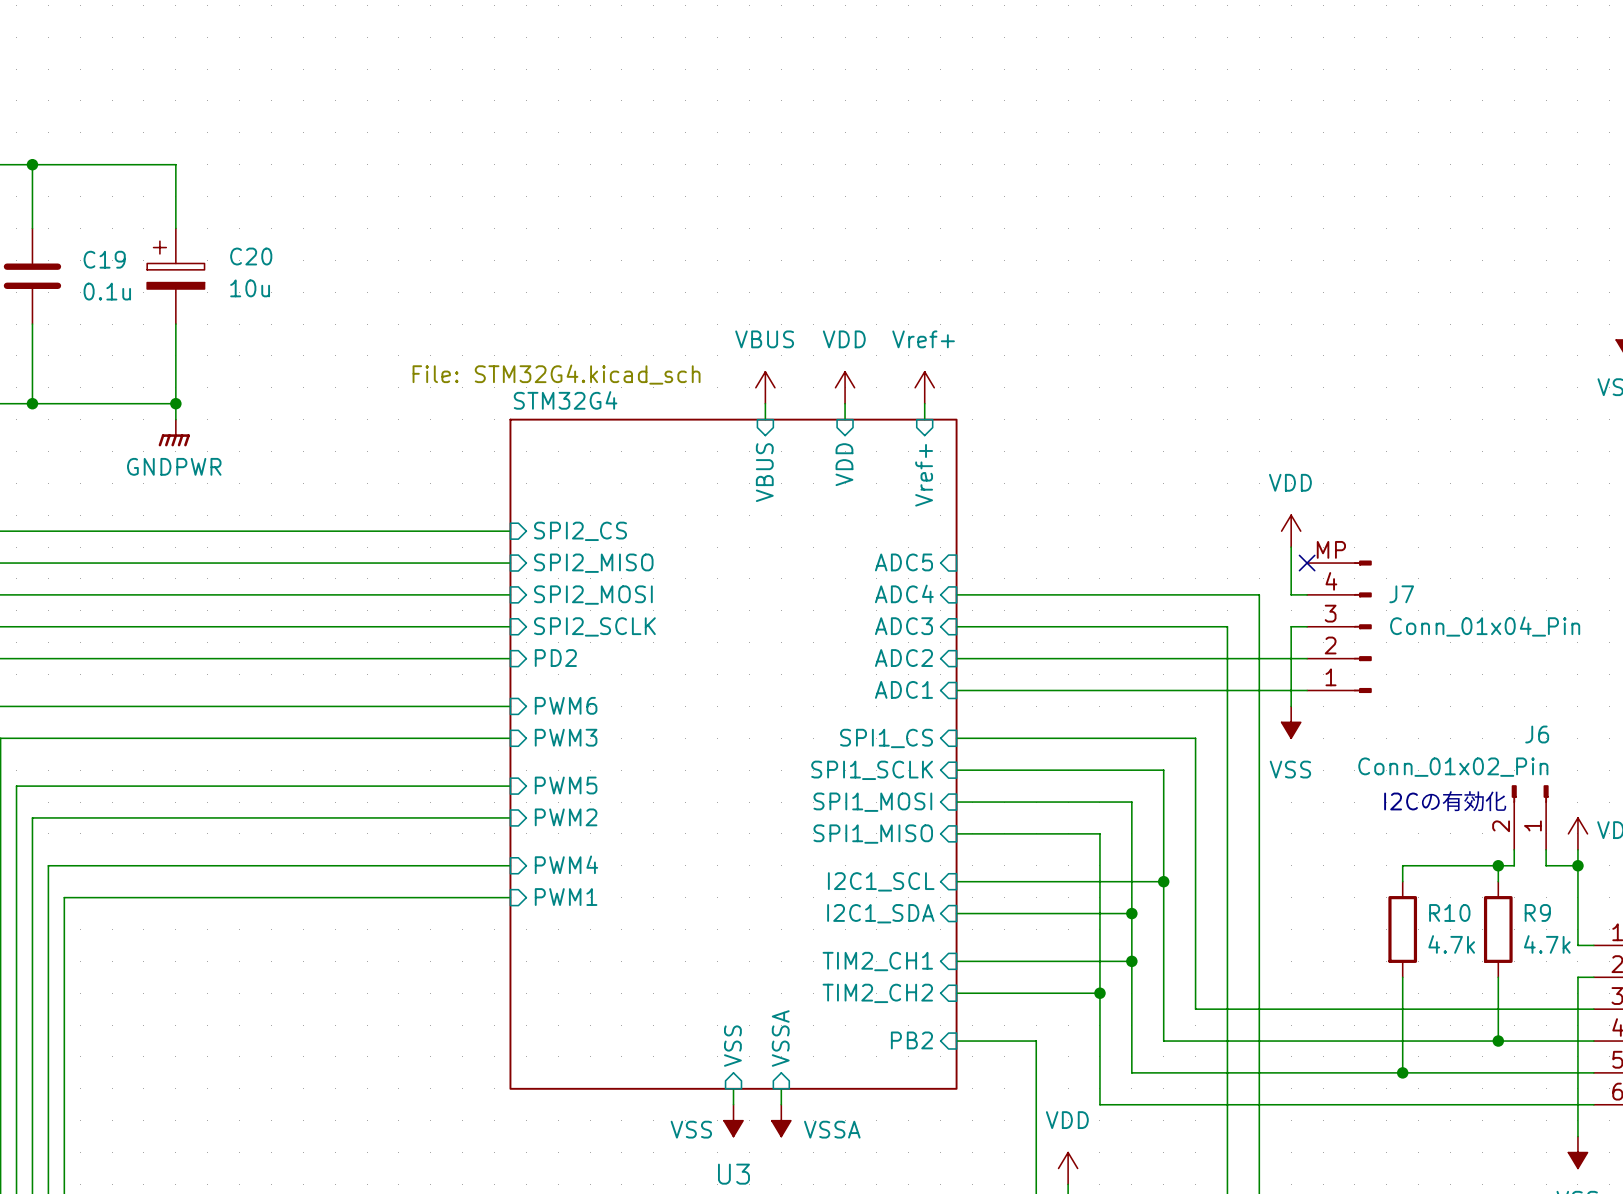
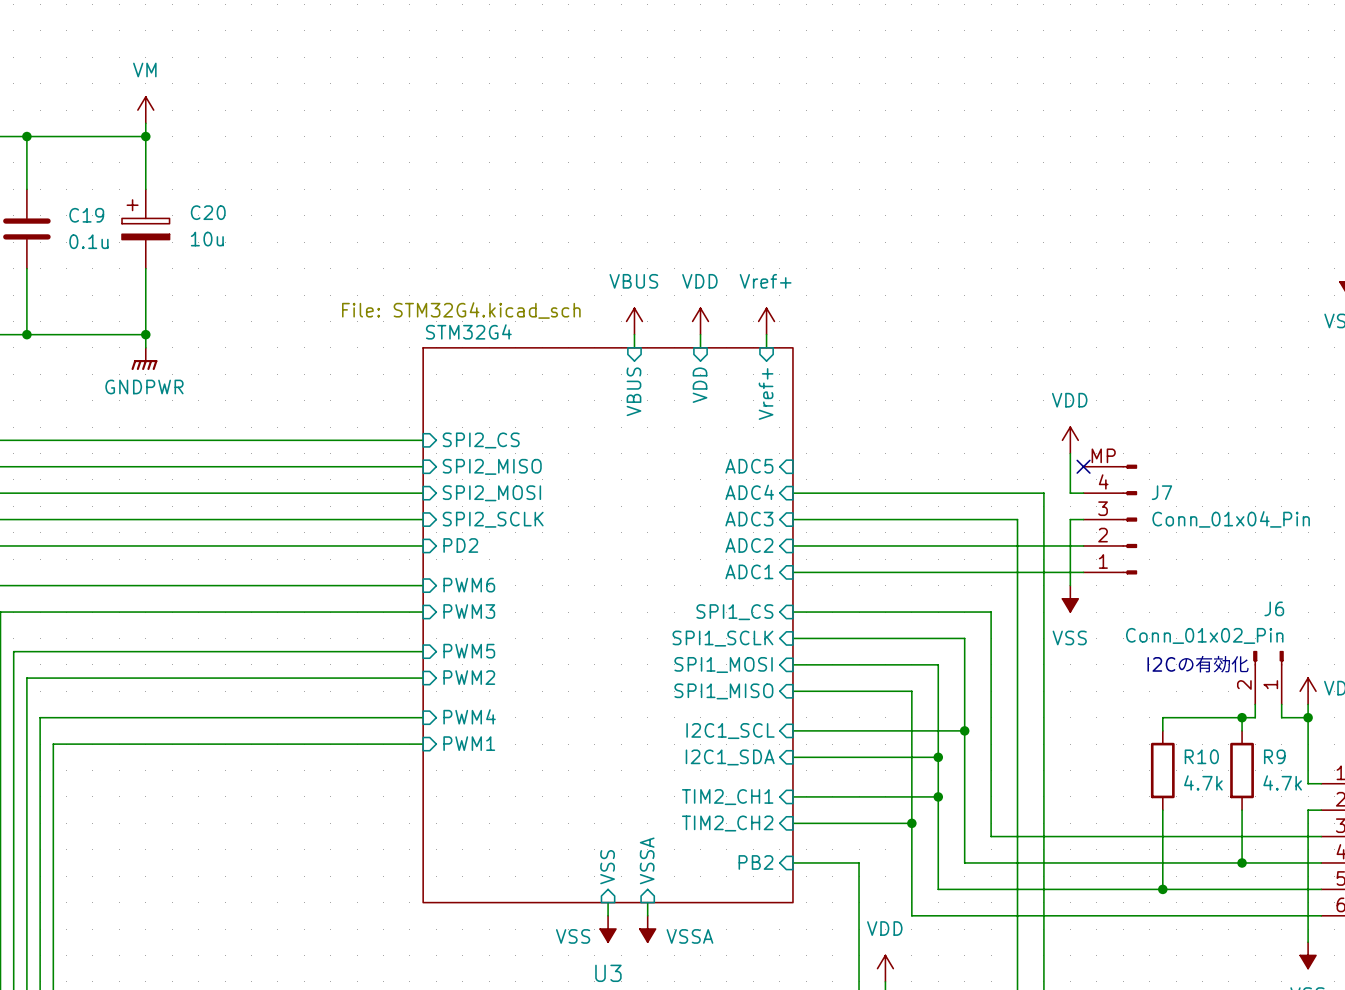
power symbol: none -> VM (145, 110)
wire: none -> (145, 123) (145, 136)
junction: none -> (145, 136)

